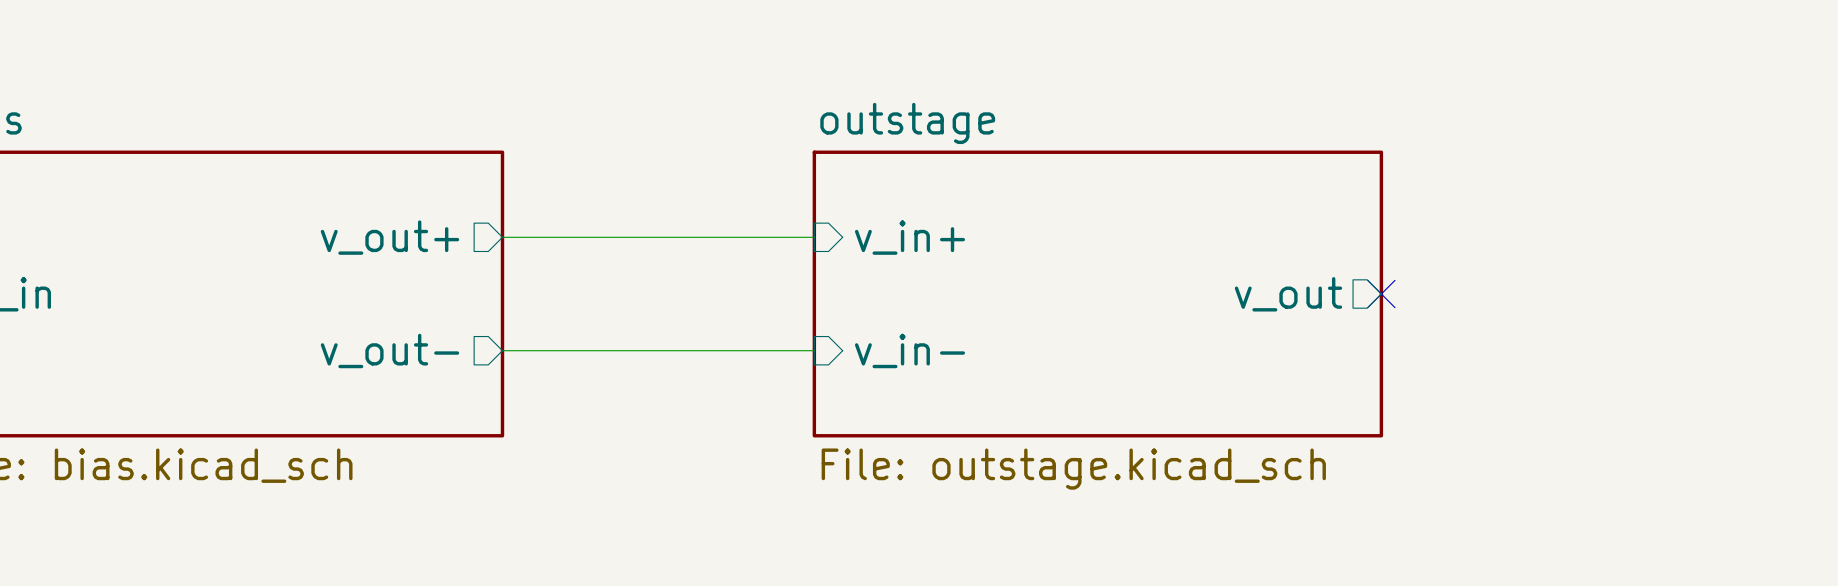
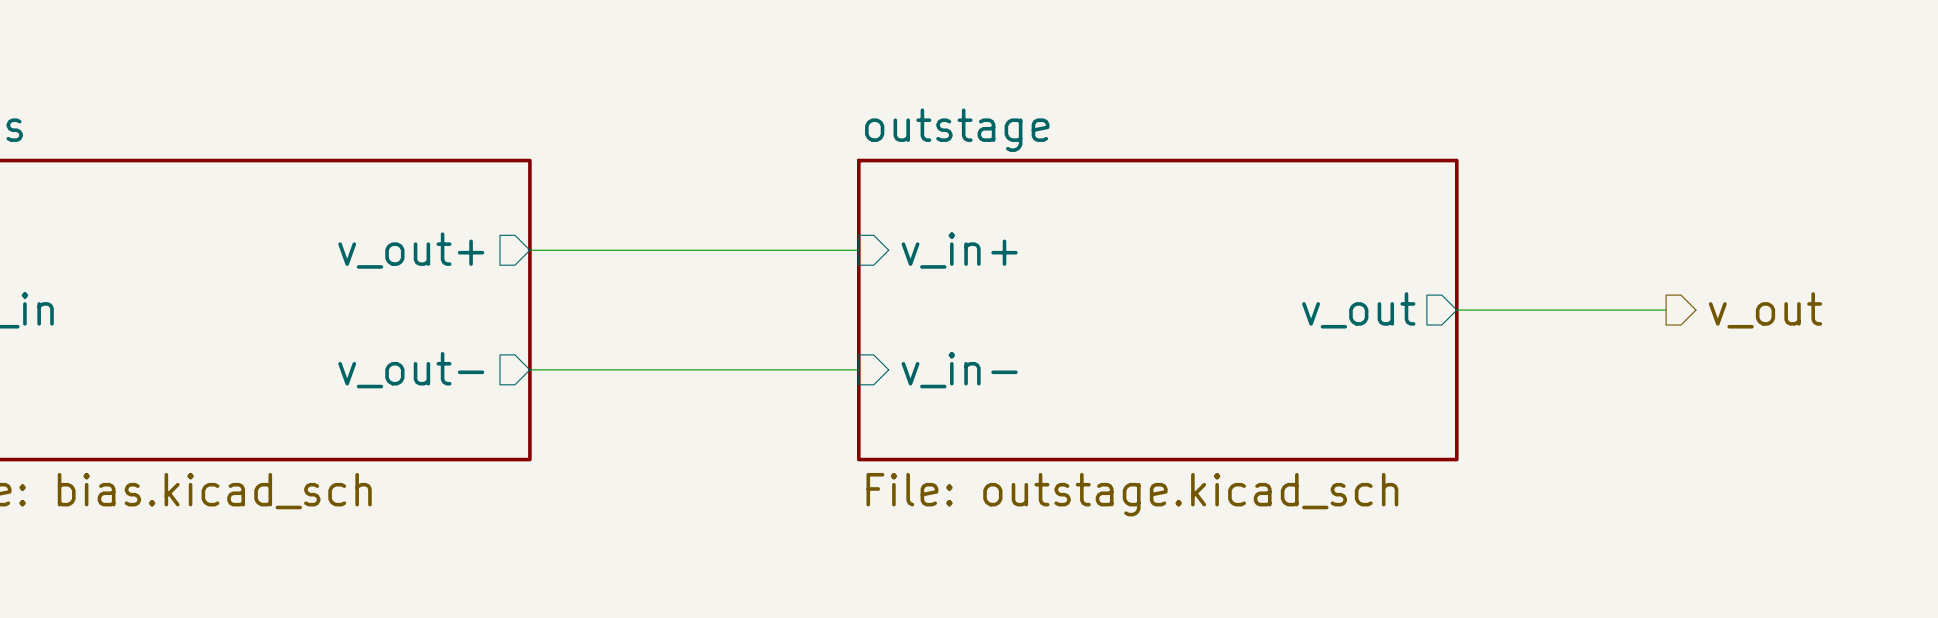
wire: none -> (1456, 310) (1666, 310)
no-connect mark: (1381, 294) -> none
hierarchical label: none -> v_out (1765, 310)

